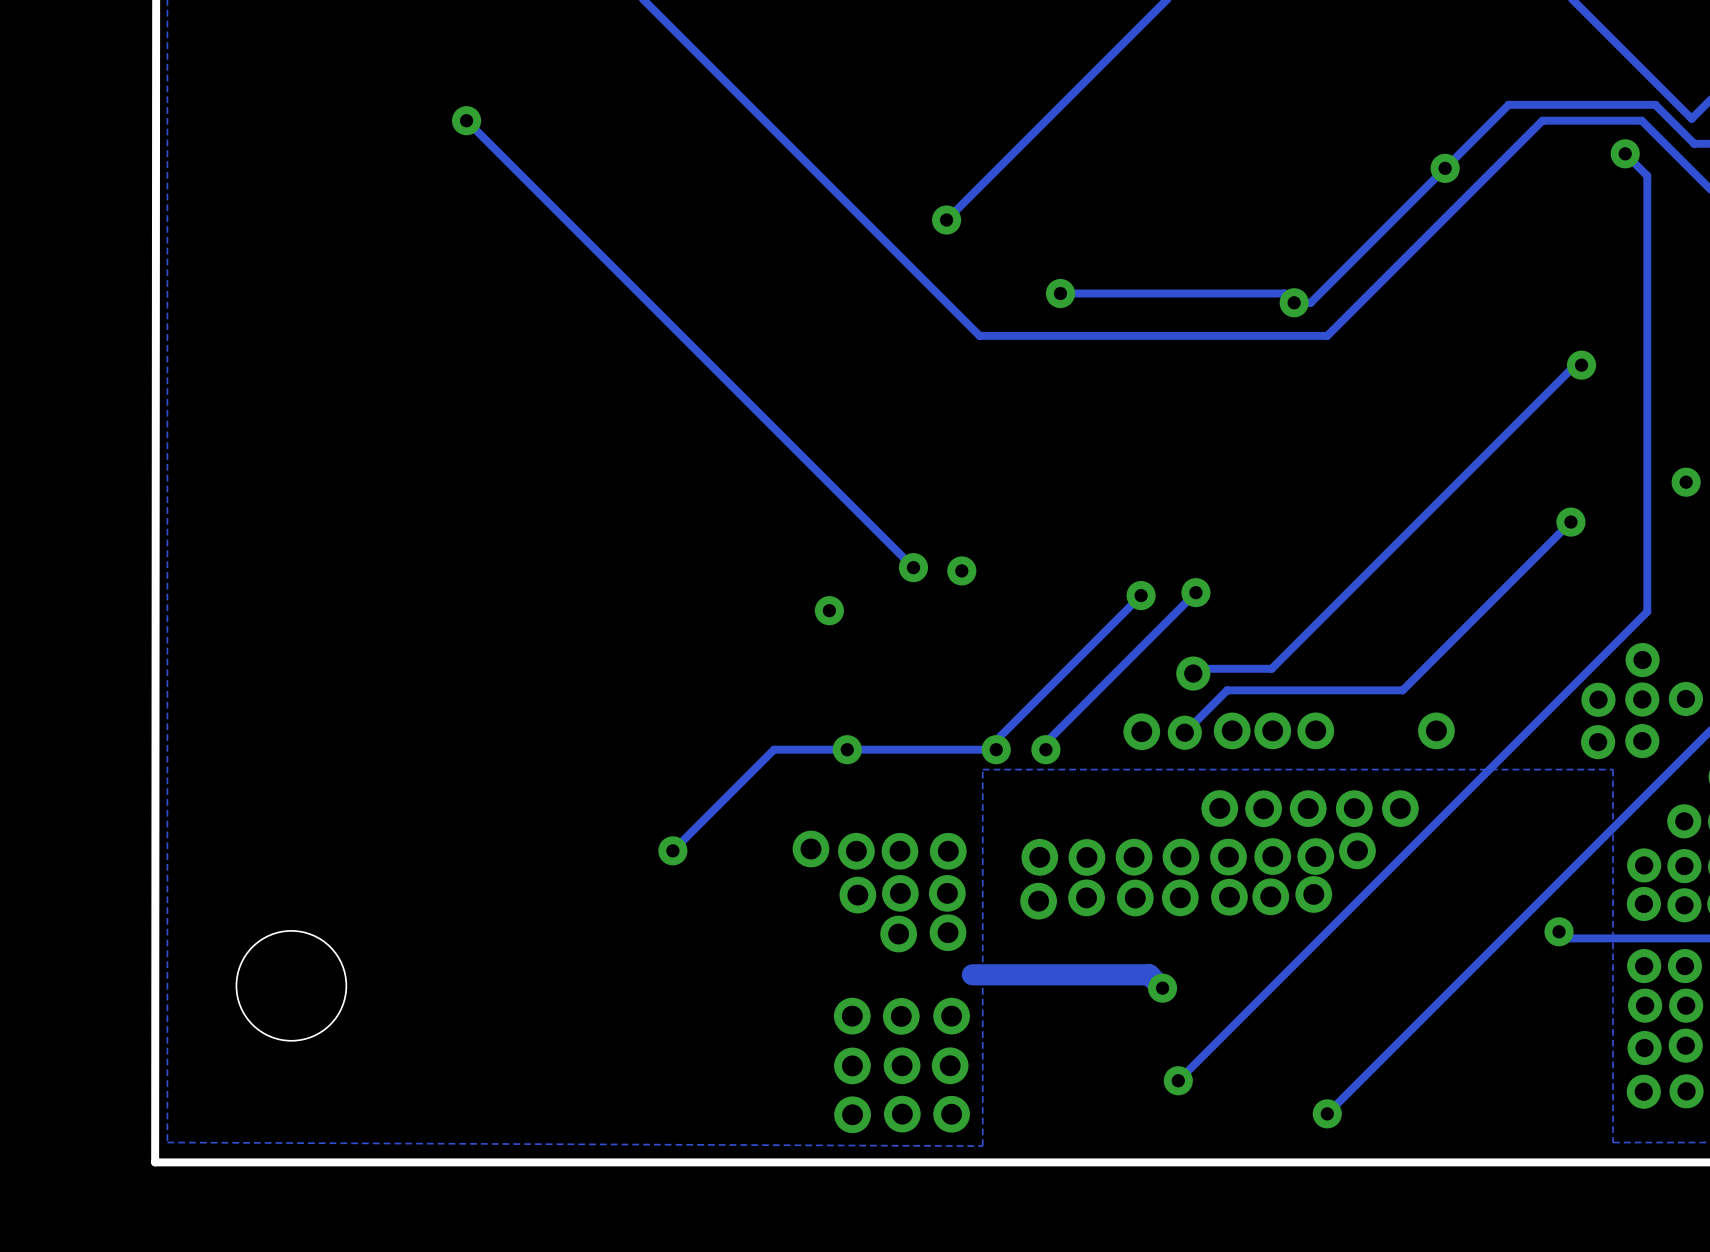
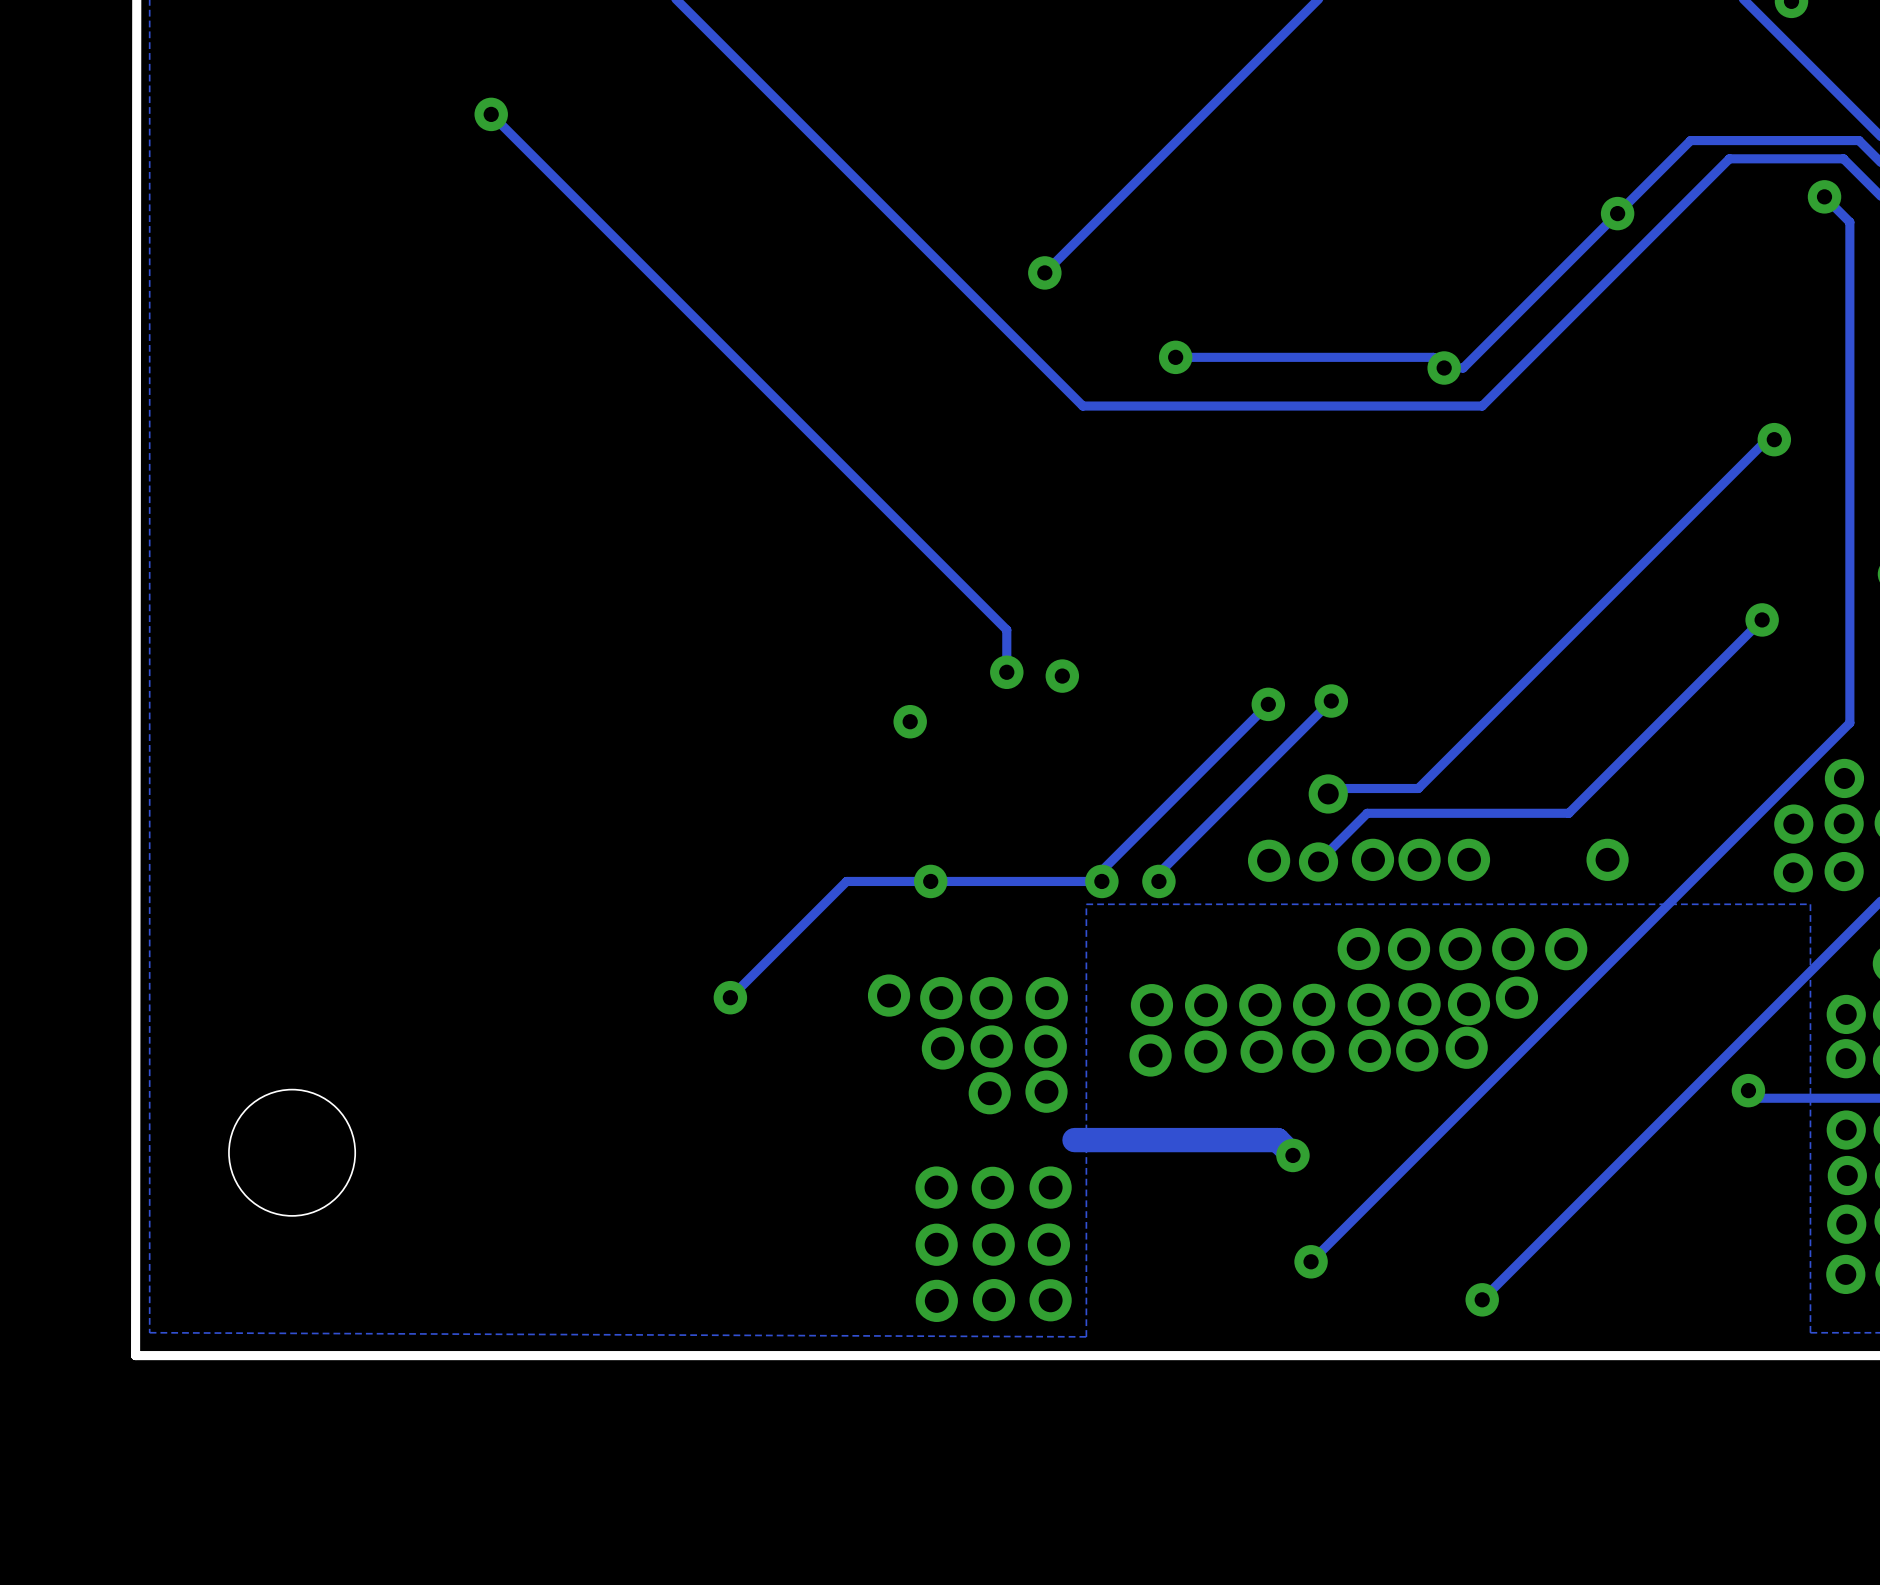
track: (466, 120) (913, 567) -> (491, 114) (1006, 629) (1006, 672)
via position: (466, 120) -> (491, 114)

